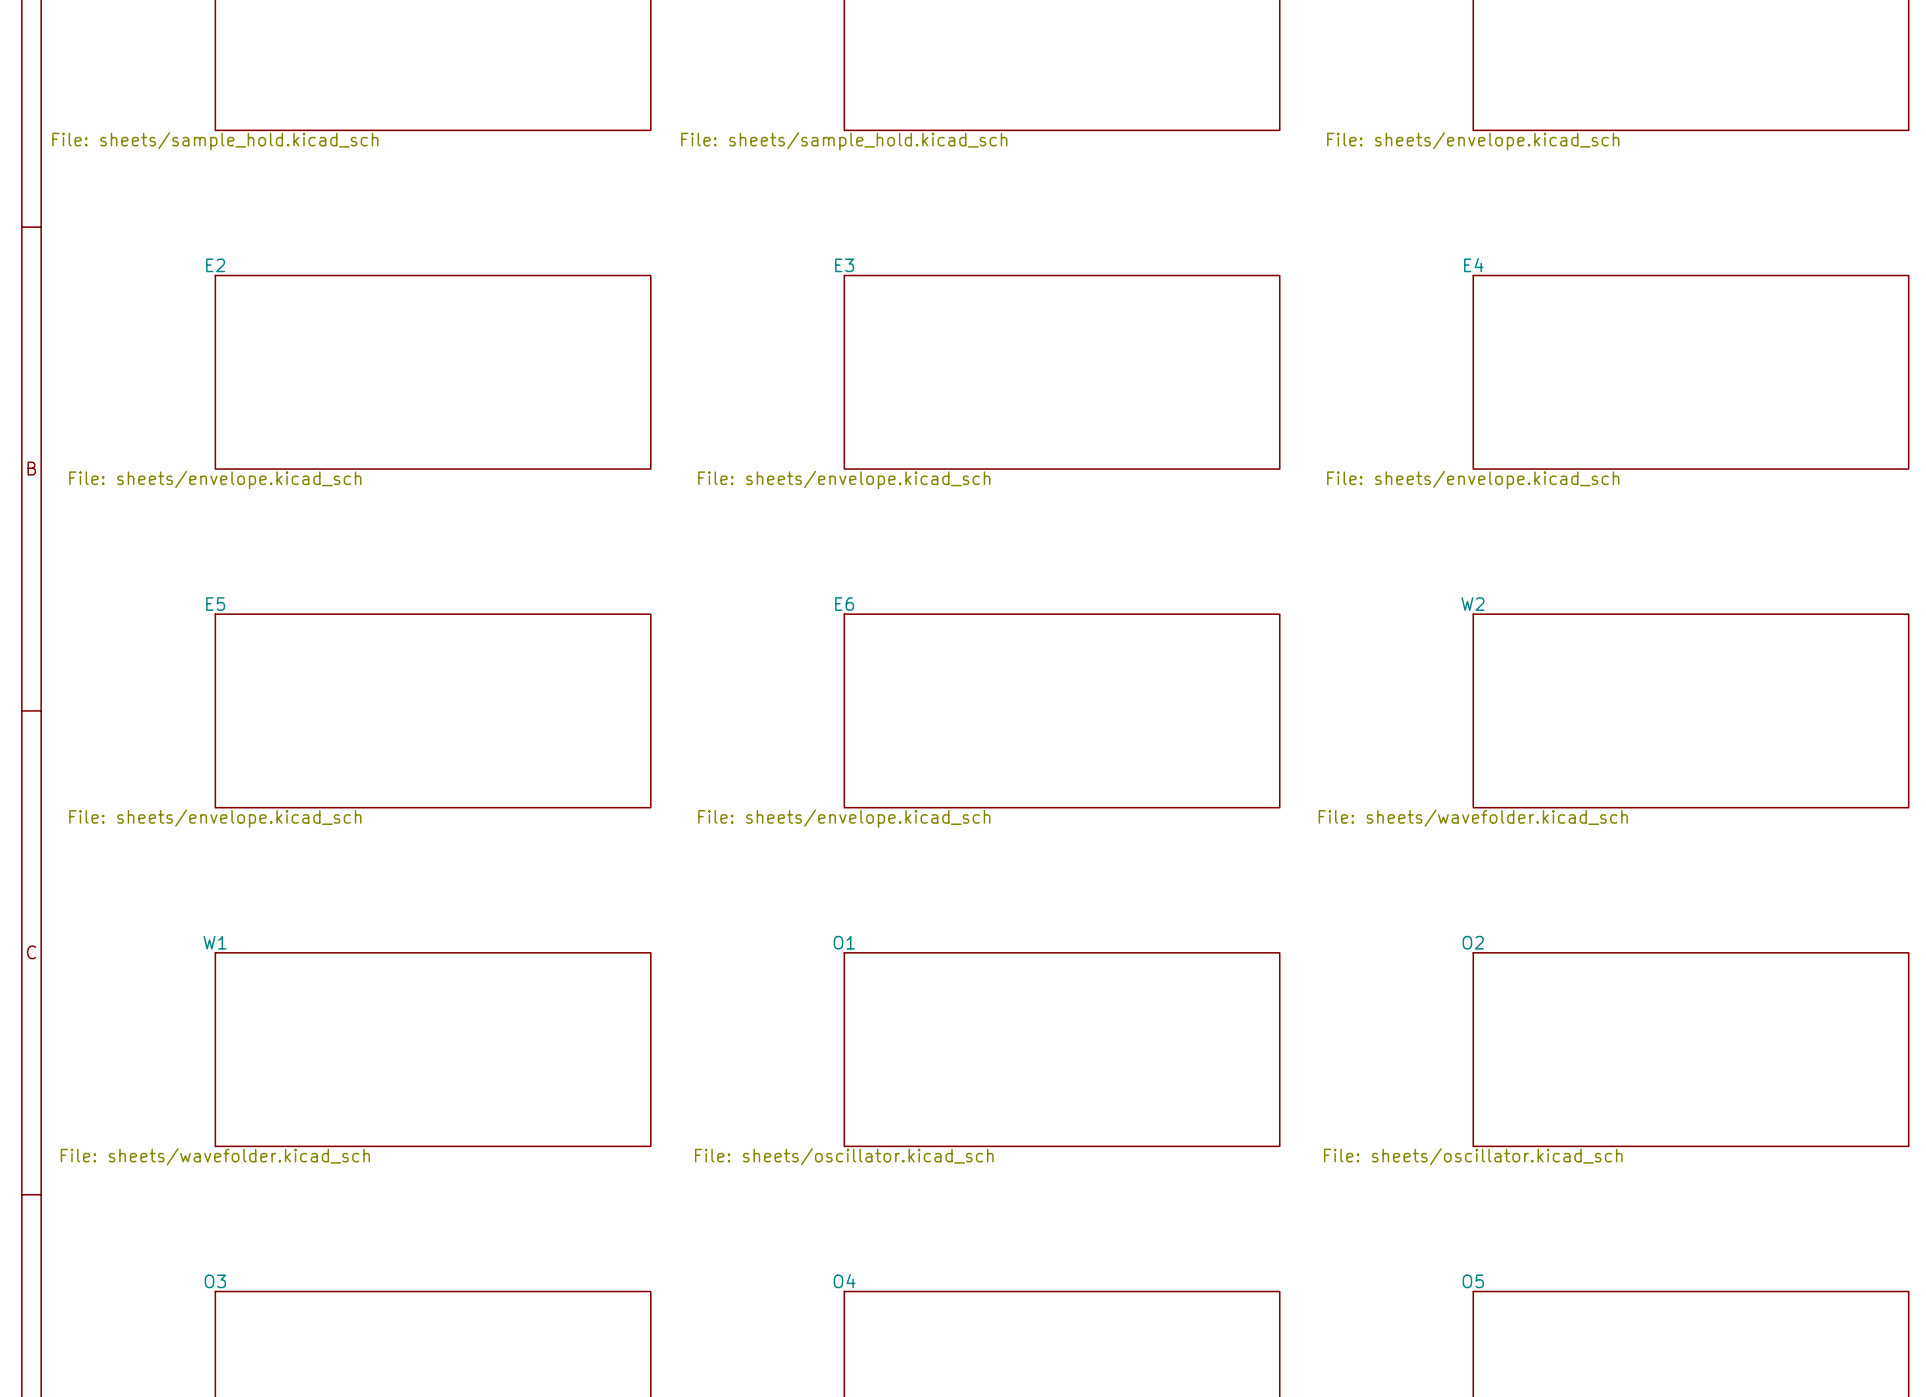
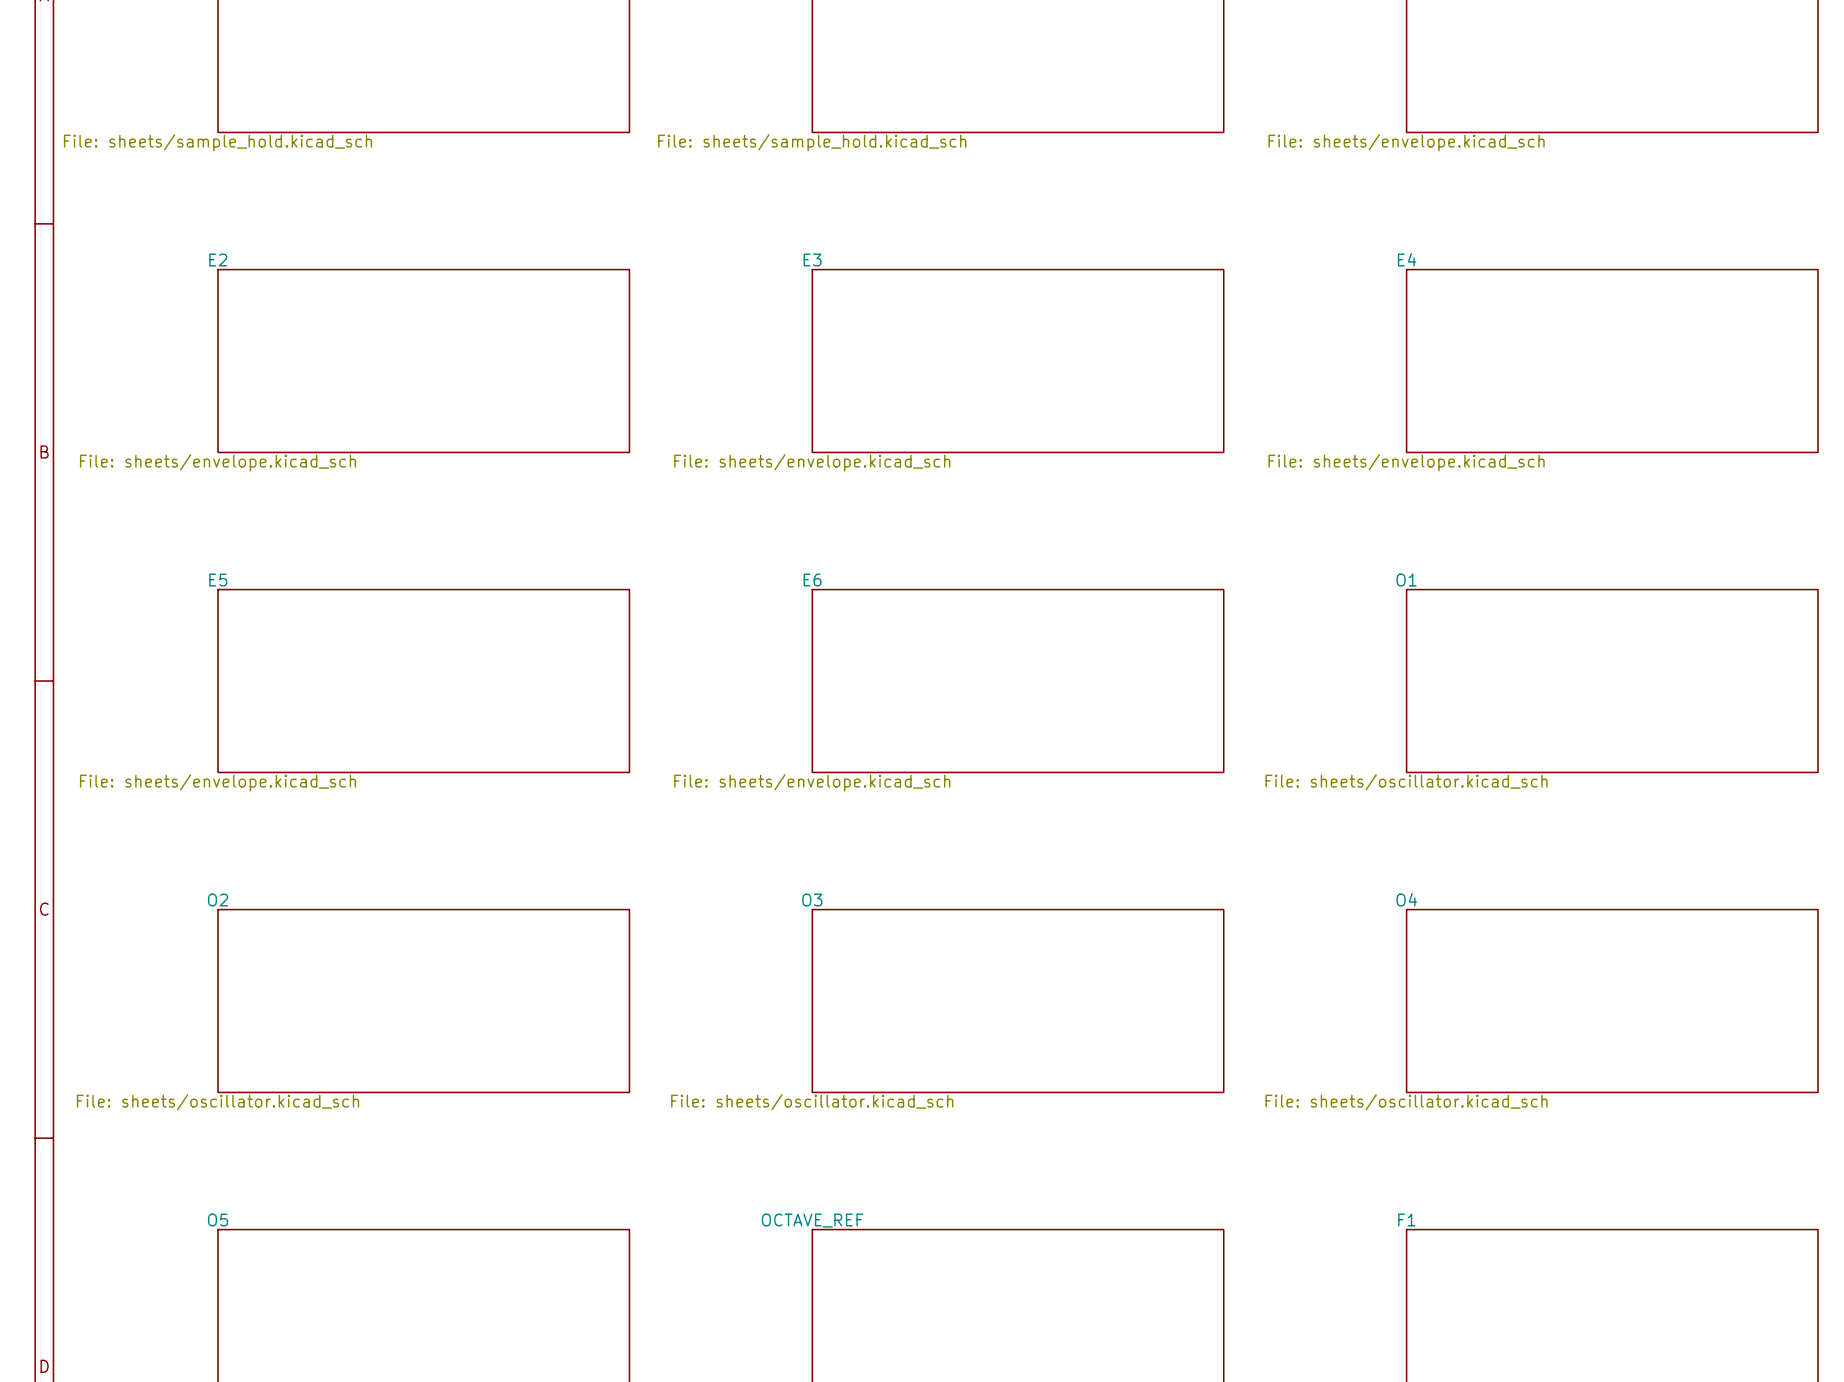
sheet W2 name: W2 (1472, 604) -> O1 (1406, 580)
sheet W2 value: File: sheets/wavefolder.kicad_sch (1473, 818) -> File: sheets/oscillator.kicad_sch (1406, 782)
sheet W1 name: W1 (215, 942) -> O2 (218, 900)
sheet O1 name: O1 (844, 942) -> O3 (812, 900)
sheet O2 name: O2 (1473, 942) -> O4 (1406, 899)
sheet W1 value: File: sheets/wavefolder.kicad_sch (215, 1156) -> File: sheets/oscillator.kicad_sch (218, 1102)
sheet O3 name: O3 (215, 1281) -> O5 (218, 1220)
sheet O4 name: O4 (844, 1281) -> OCTAVE_REF (812, 1220)
sheet O5 name: O5 (1473, 1281) -> F1 (1406, 1220)

